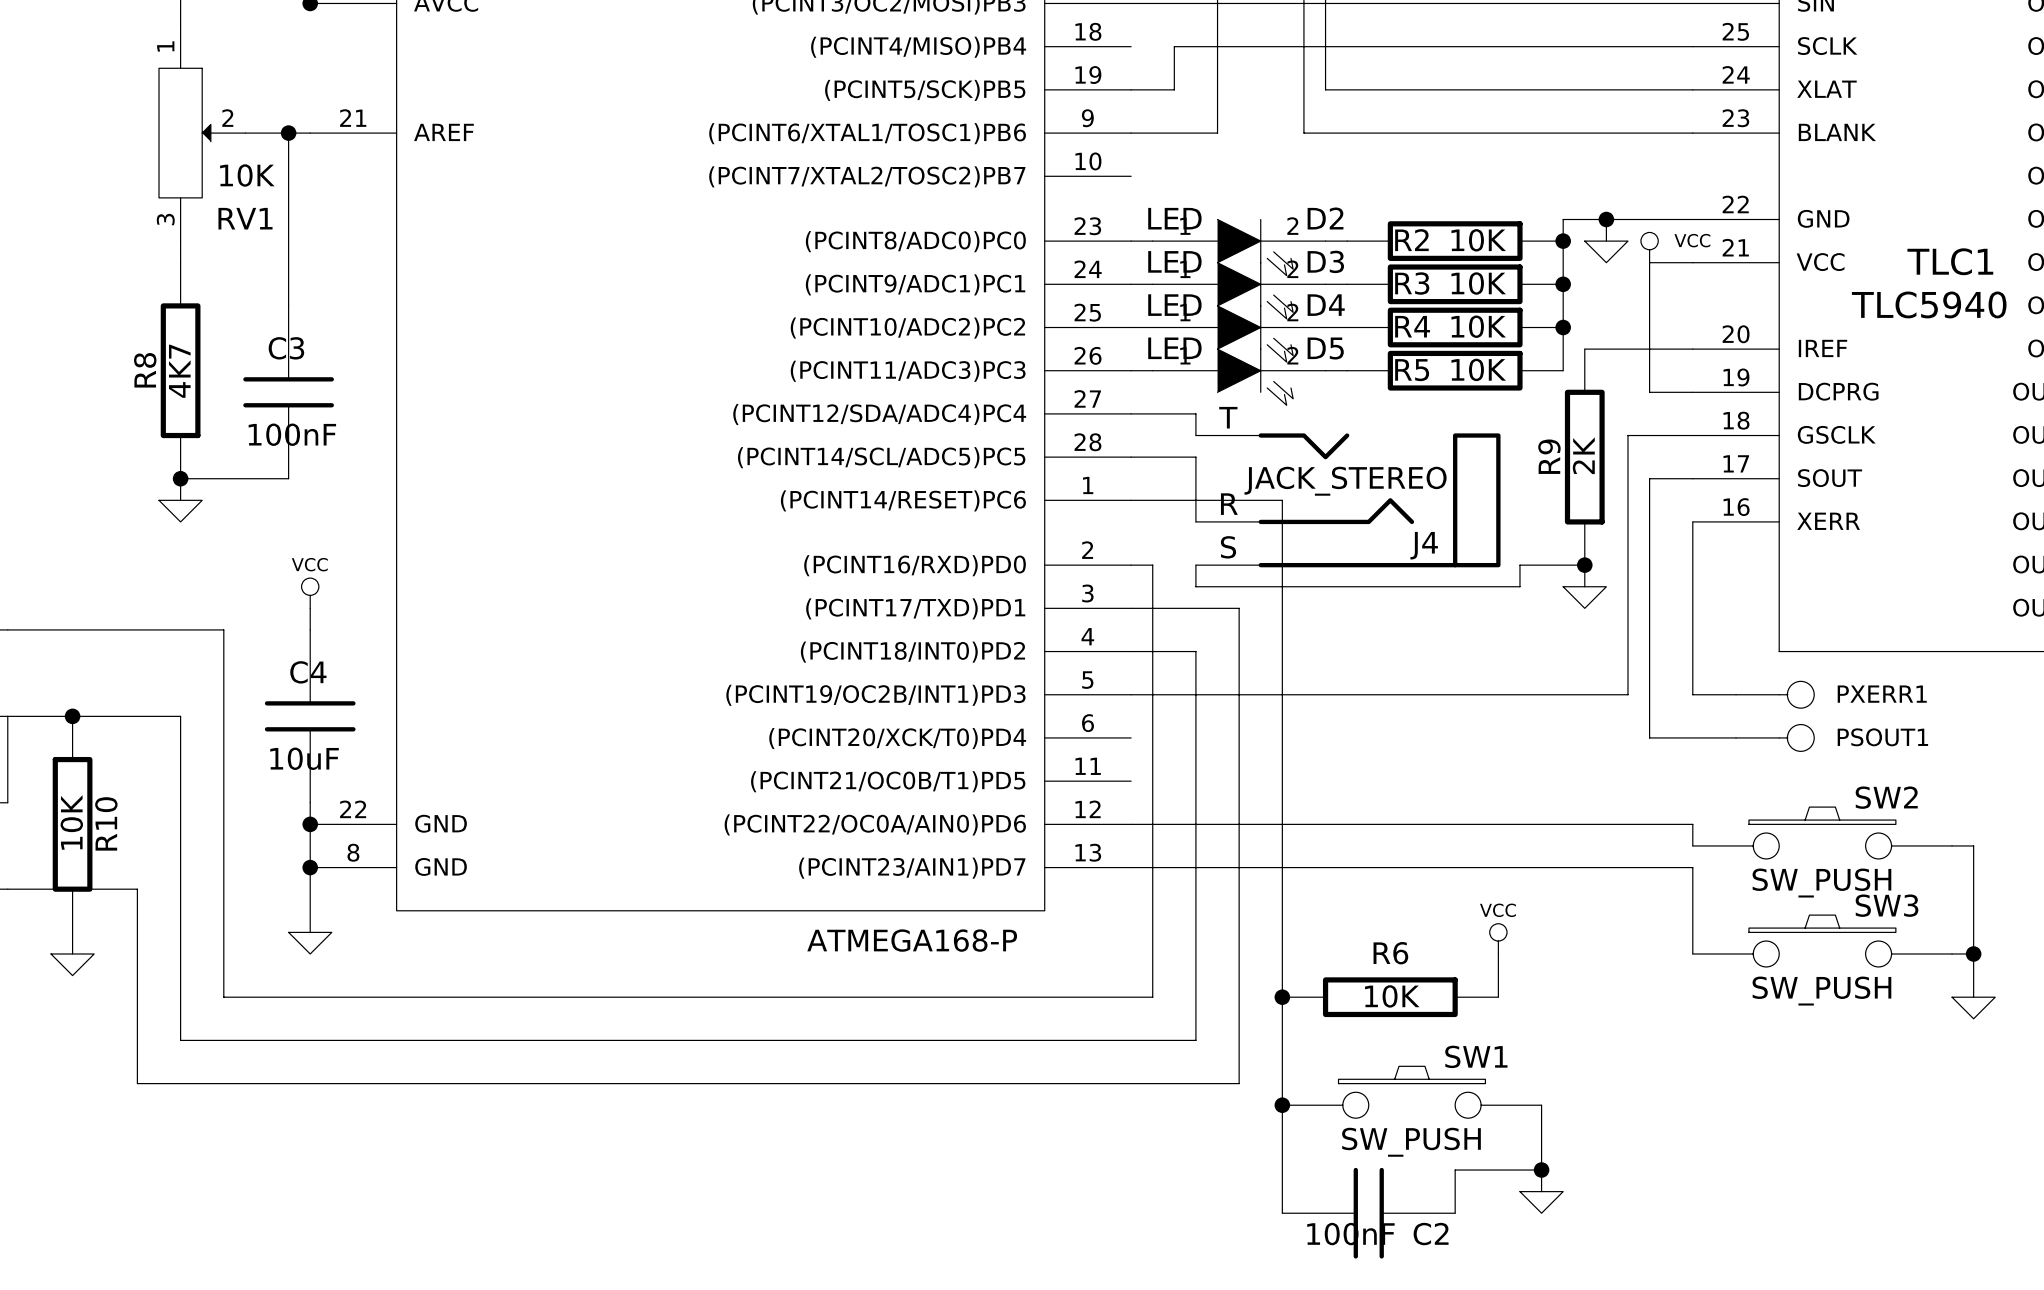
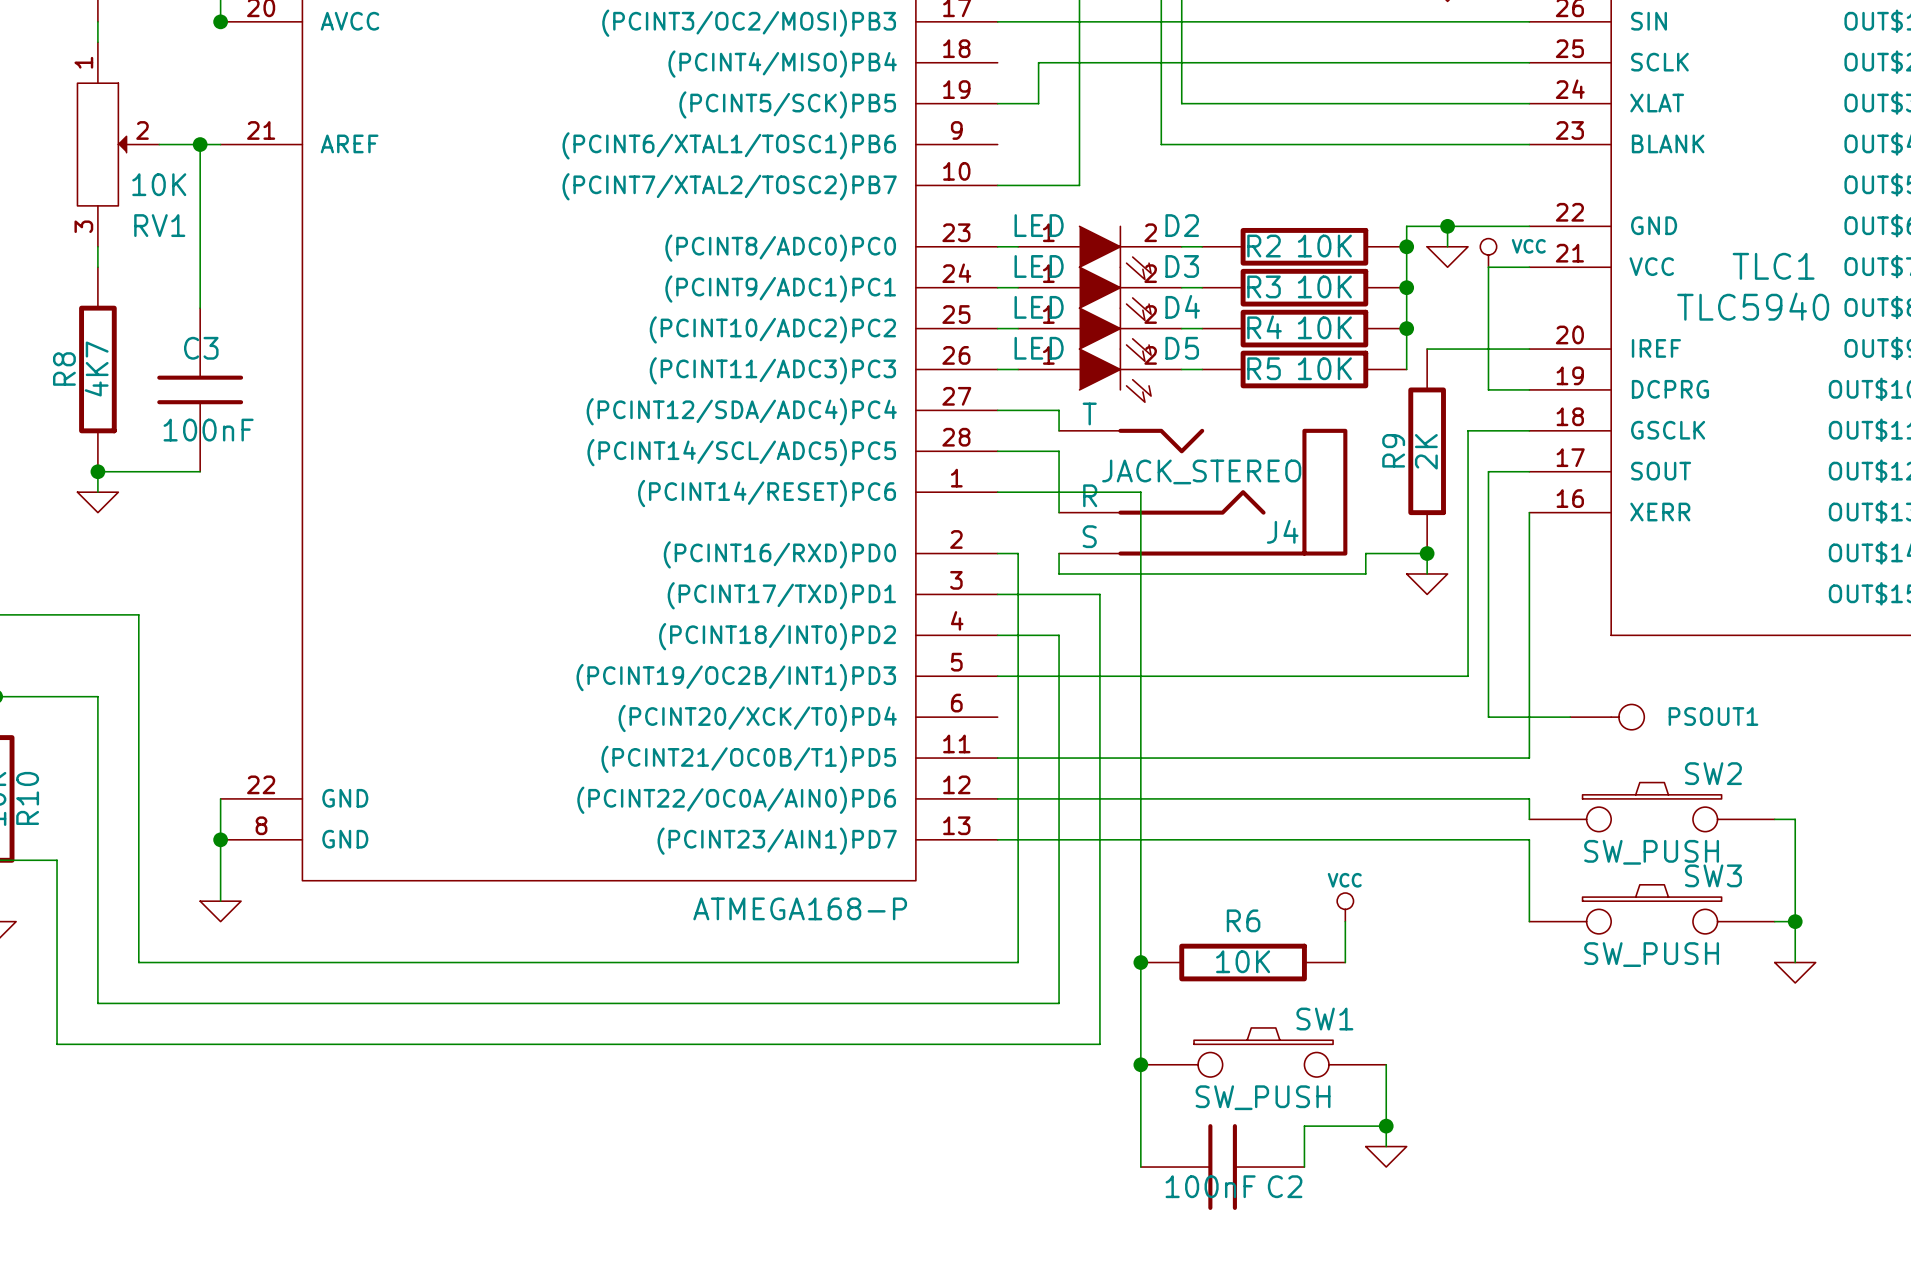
wire: (1131, 133) (1217, 133) -> (997, 185) (1079, 185) (1079, 144)
power symbol: VCC (310, 593) -> none
wire: (310, 608) (310, 629) -> none
wire: (1692, 694) (1736, 694) -> (1529, 676) (1529, 758) (997, 758)
PXERR1: (1775, 694) -> none
C4: 10uF (310, 716) -> none
wire: (310, 802) (310, 824) -> none
junction: (310, 824) -> none

